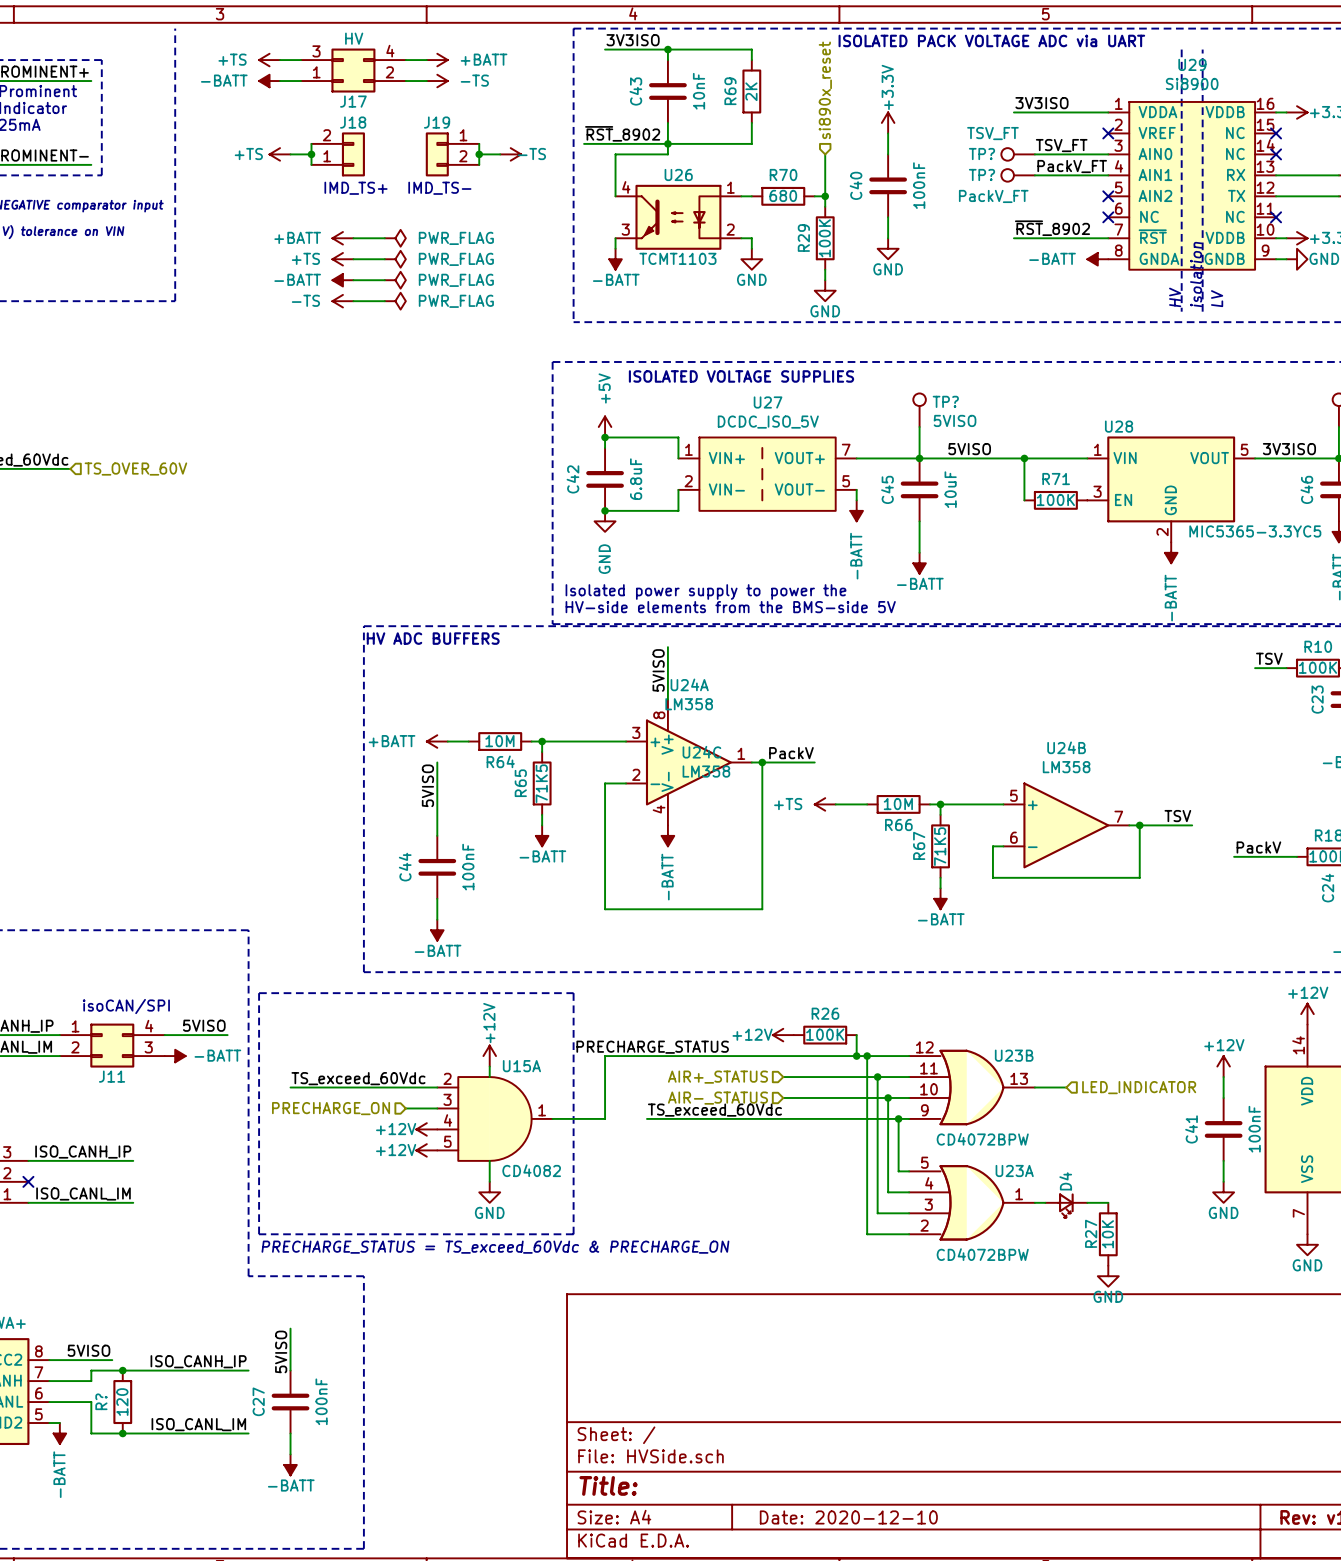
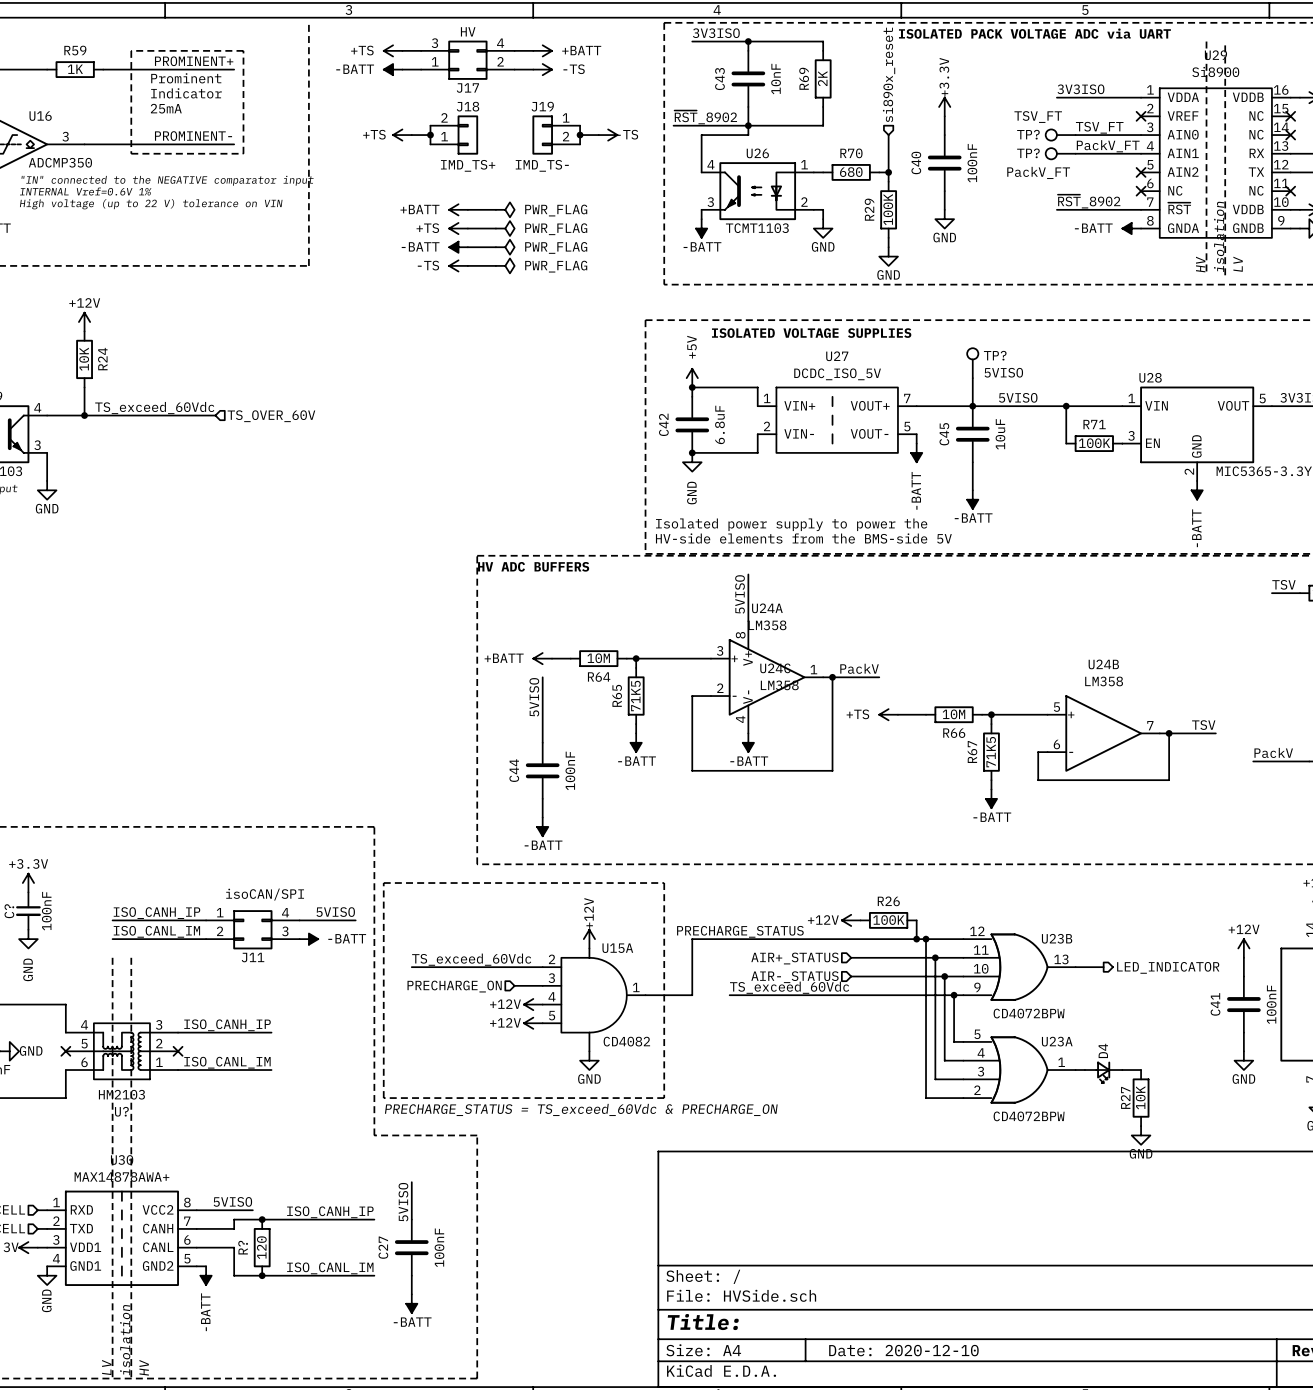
wire: (605, 867) (605, 909) (762, 909) (762, 867) -> (692, 770) (832, 770)
power symbol text rotation: 0° (667, 877) -> 90° clockwise (749, 761)
hierarchical label shape: input (1139, 1087) -> output (1168, 967)

